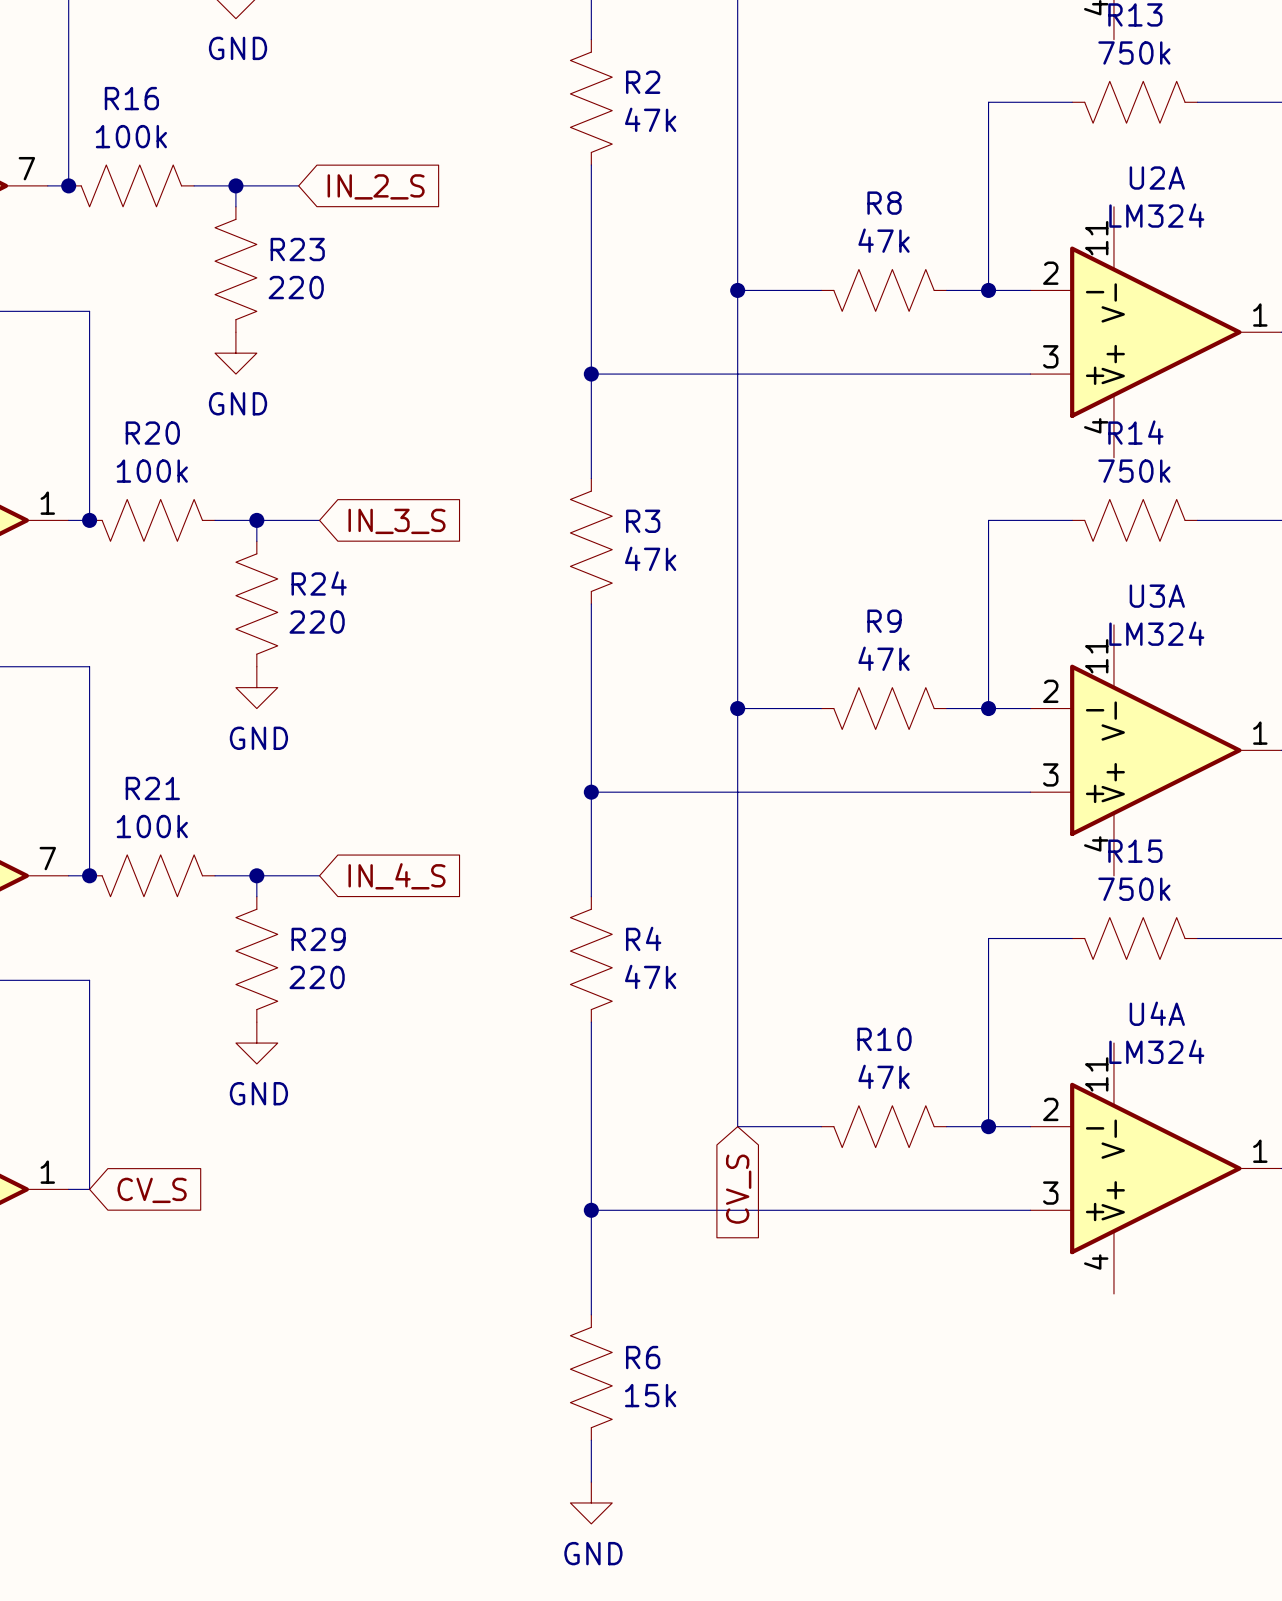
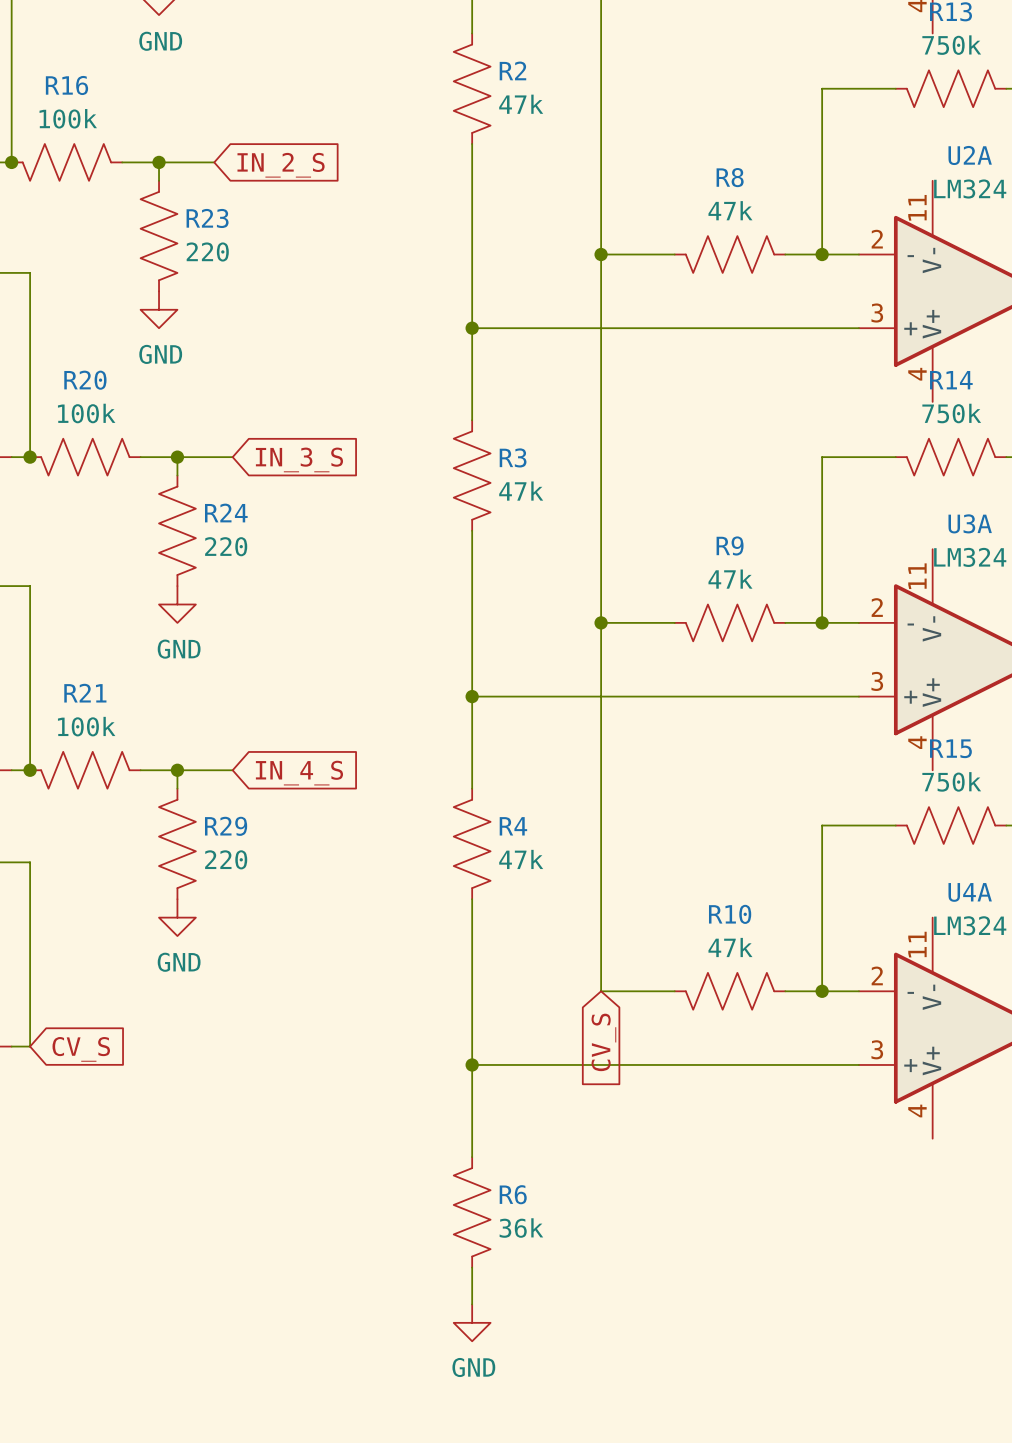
R6 value: 15k (650, 1395) -> 36k (521, 1228)

